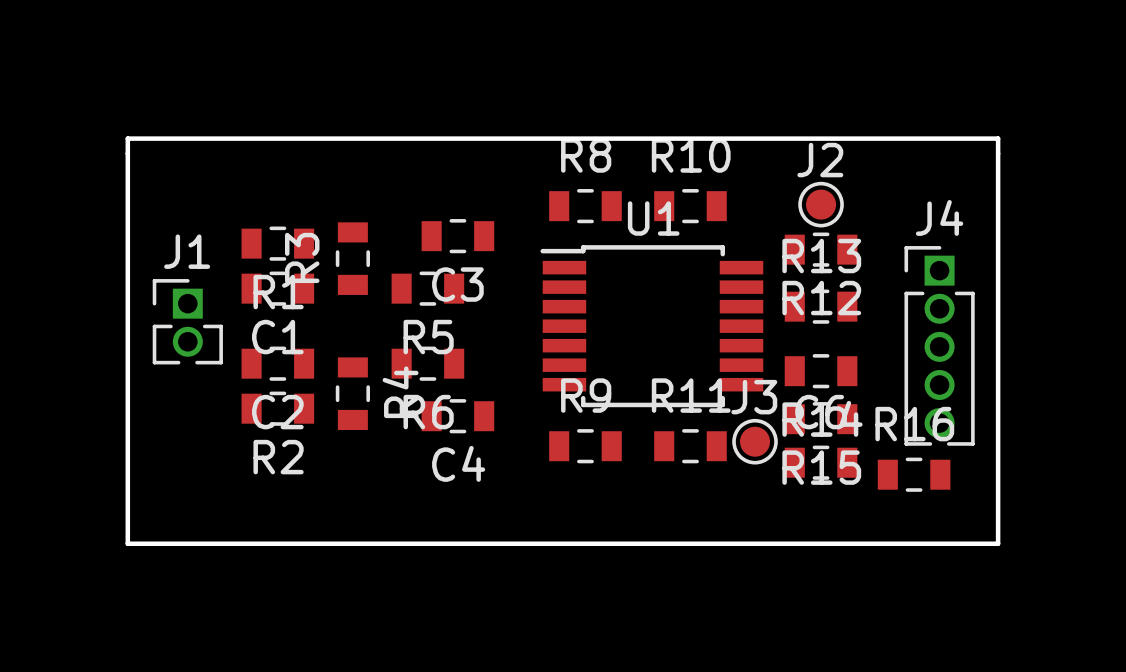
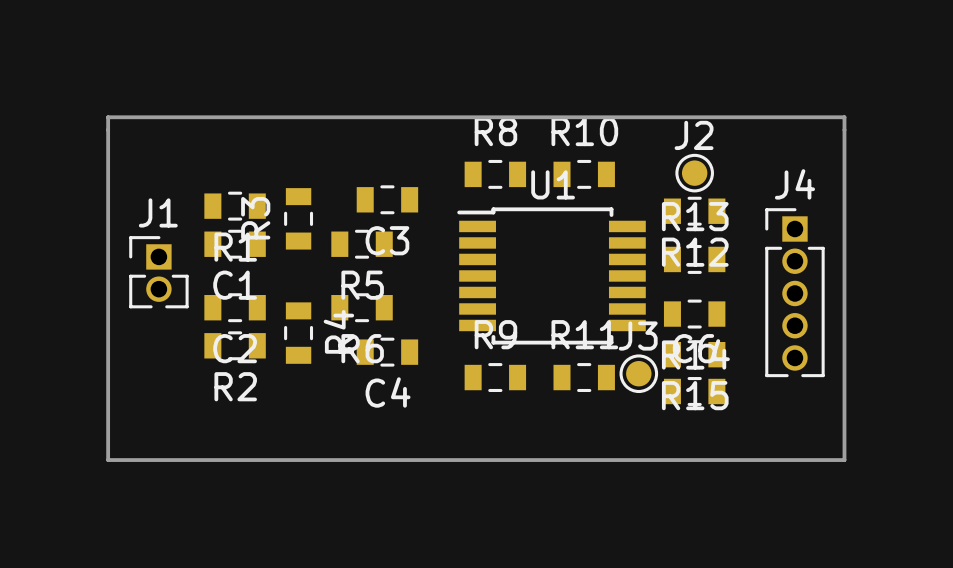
R16: (914, 474) -> none

